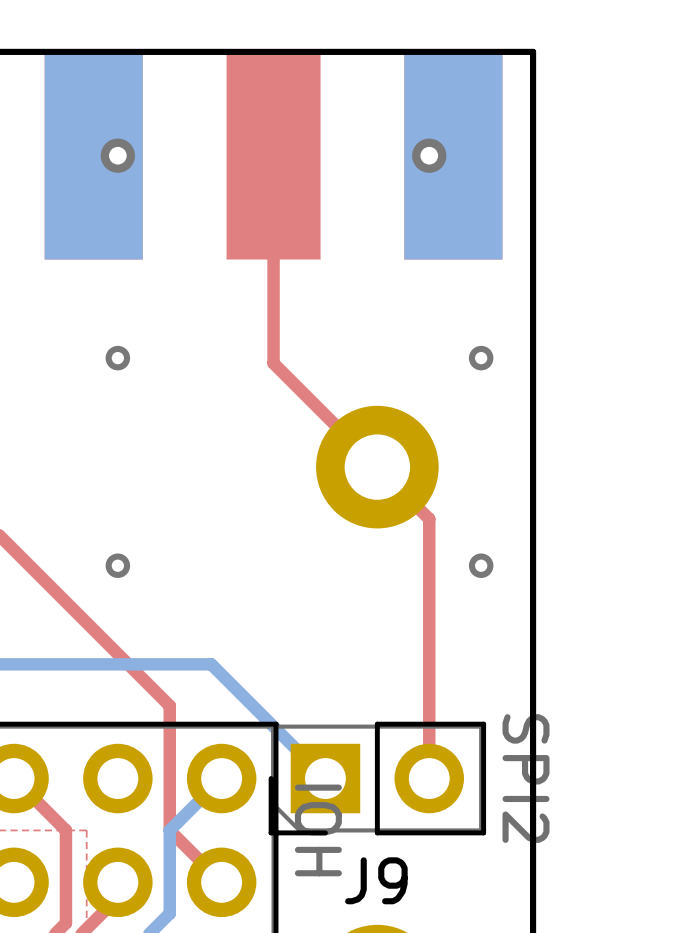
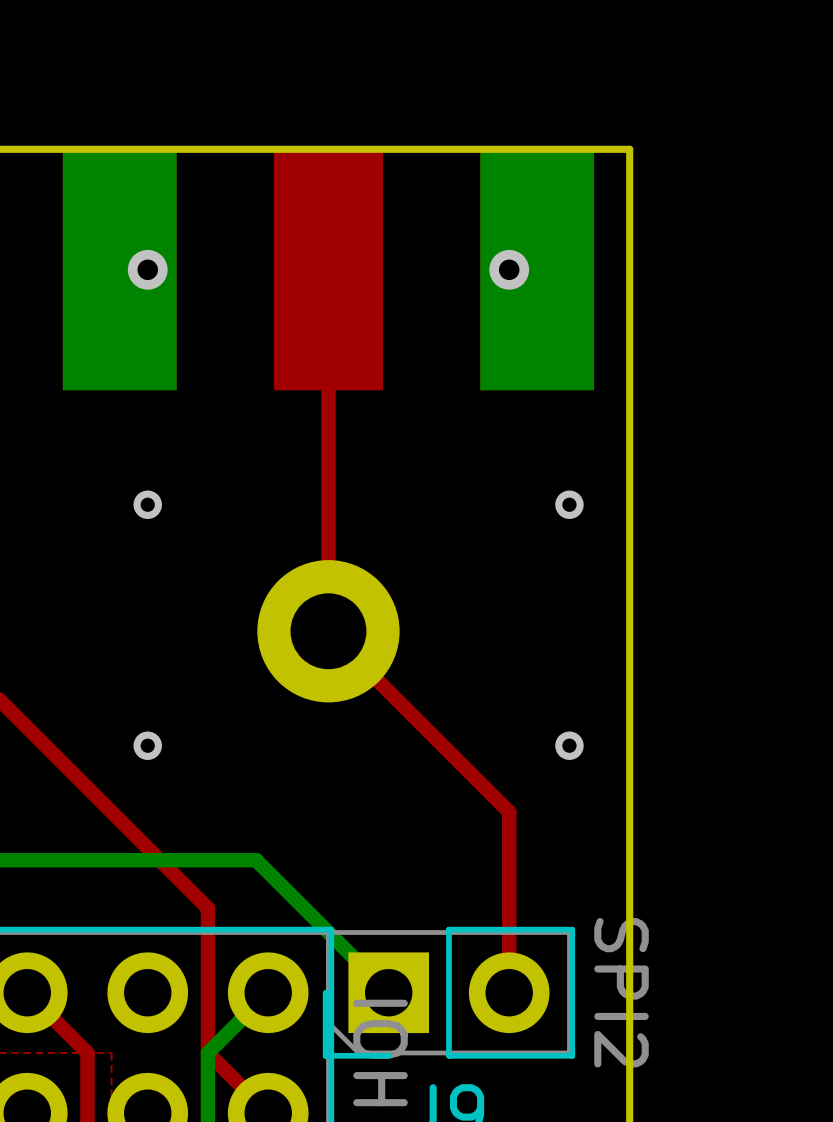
top track: (273, 363) (429, 519) (429, 622) -> (328, 510) (328, 631) (509, 811)
part position: (377, 467) -> (328, 631)

